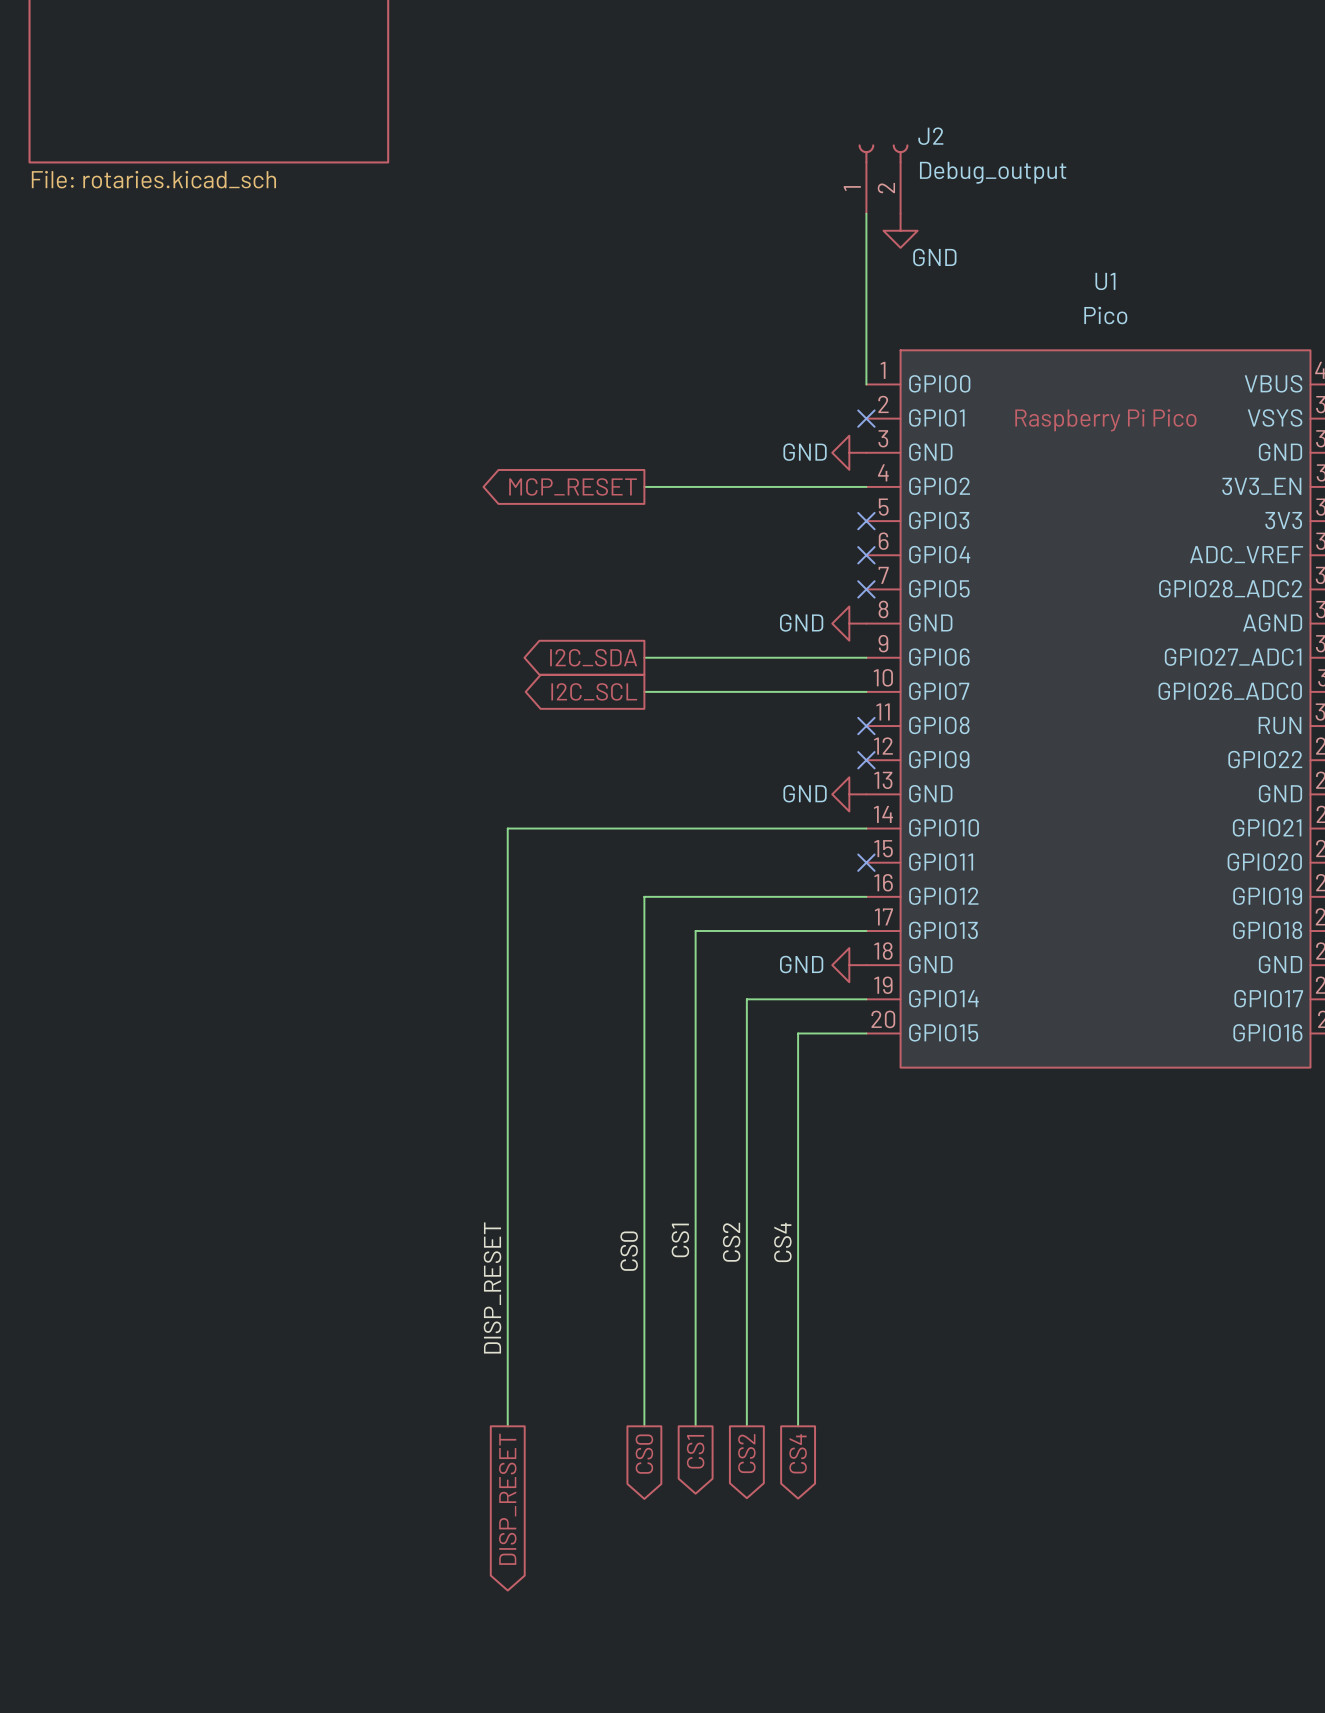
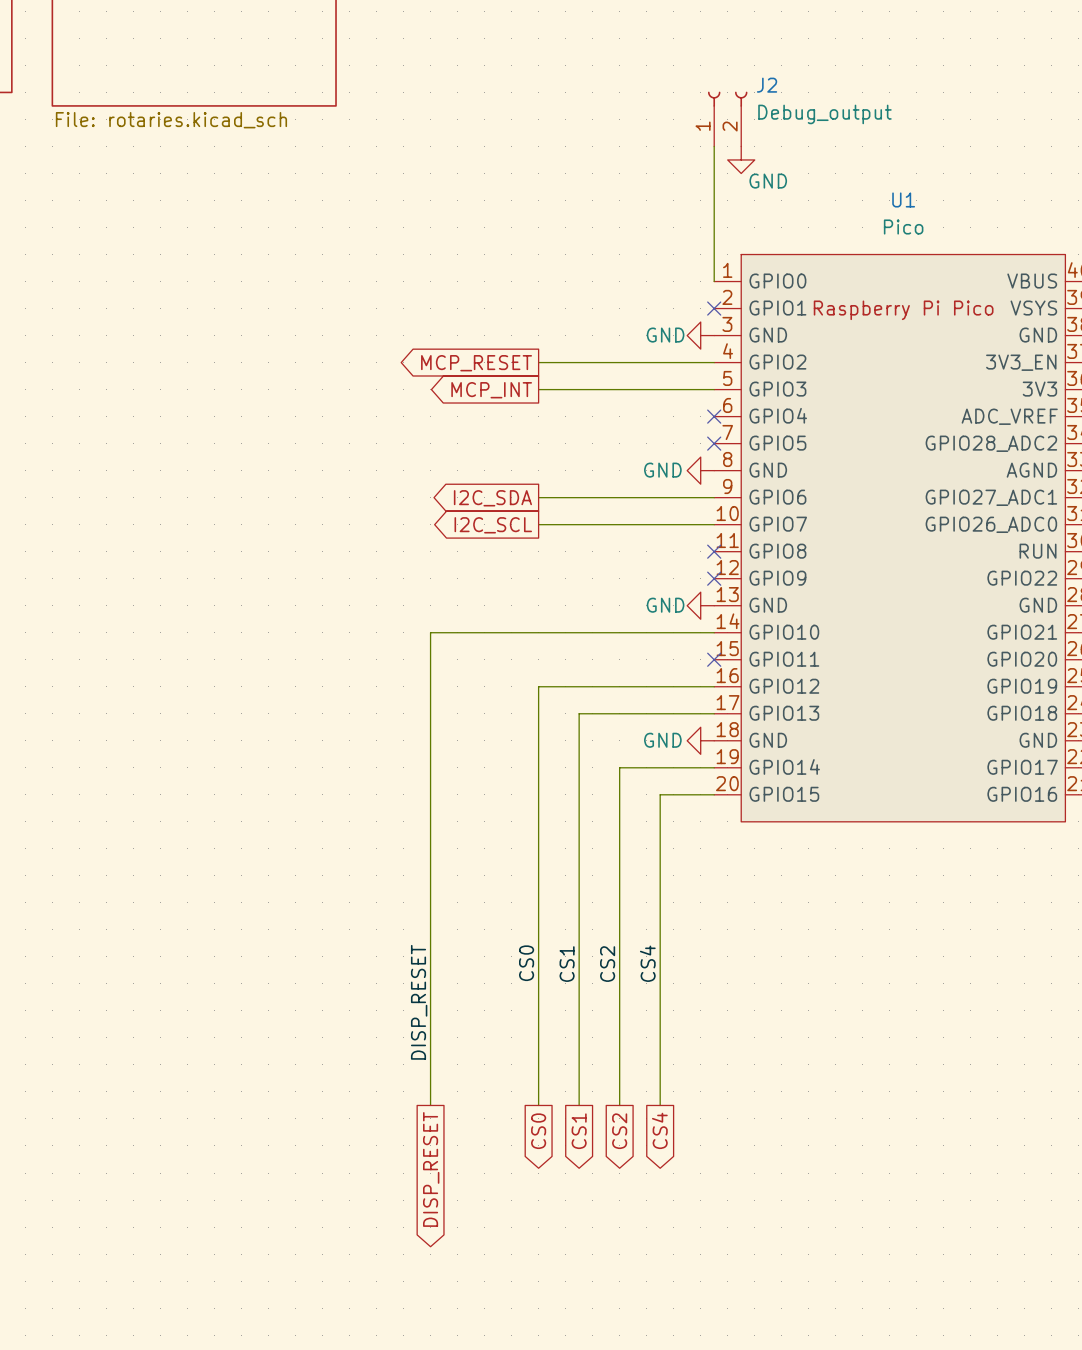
global label: none -> MCP_INT (491, 390)
wire: none -> (538, 389) (714, 389)
no-connect mark: (866, 521) -> none

